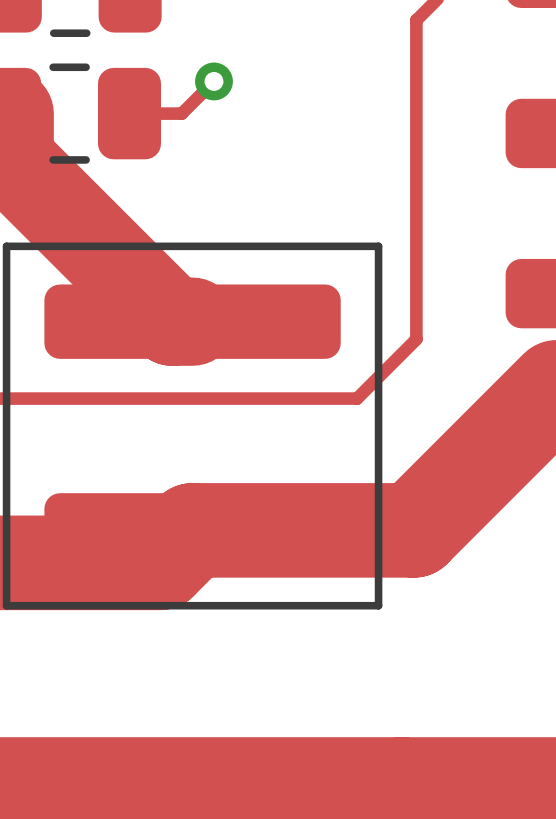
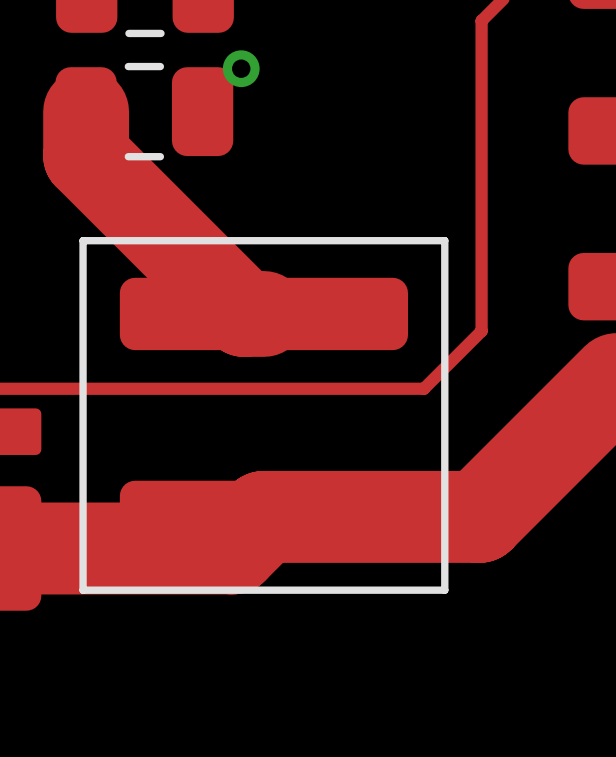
top track: (213, 81) (181, 113) (129, 113) -> none
via position: (213, 81) -> (241, 68)

